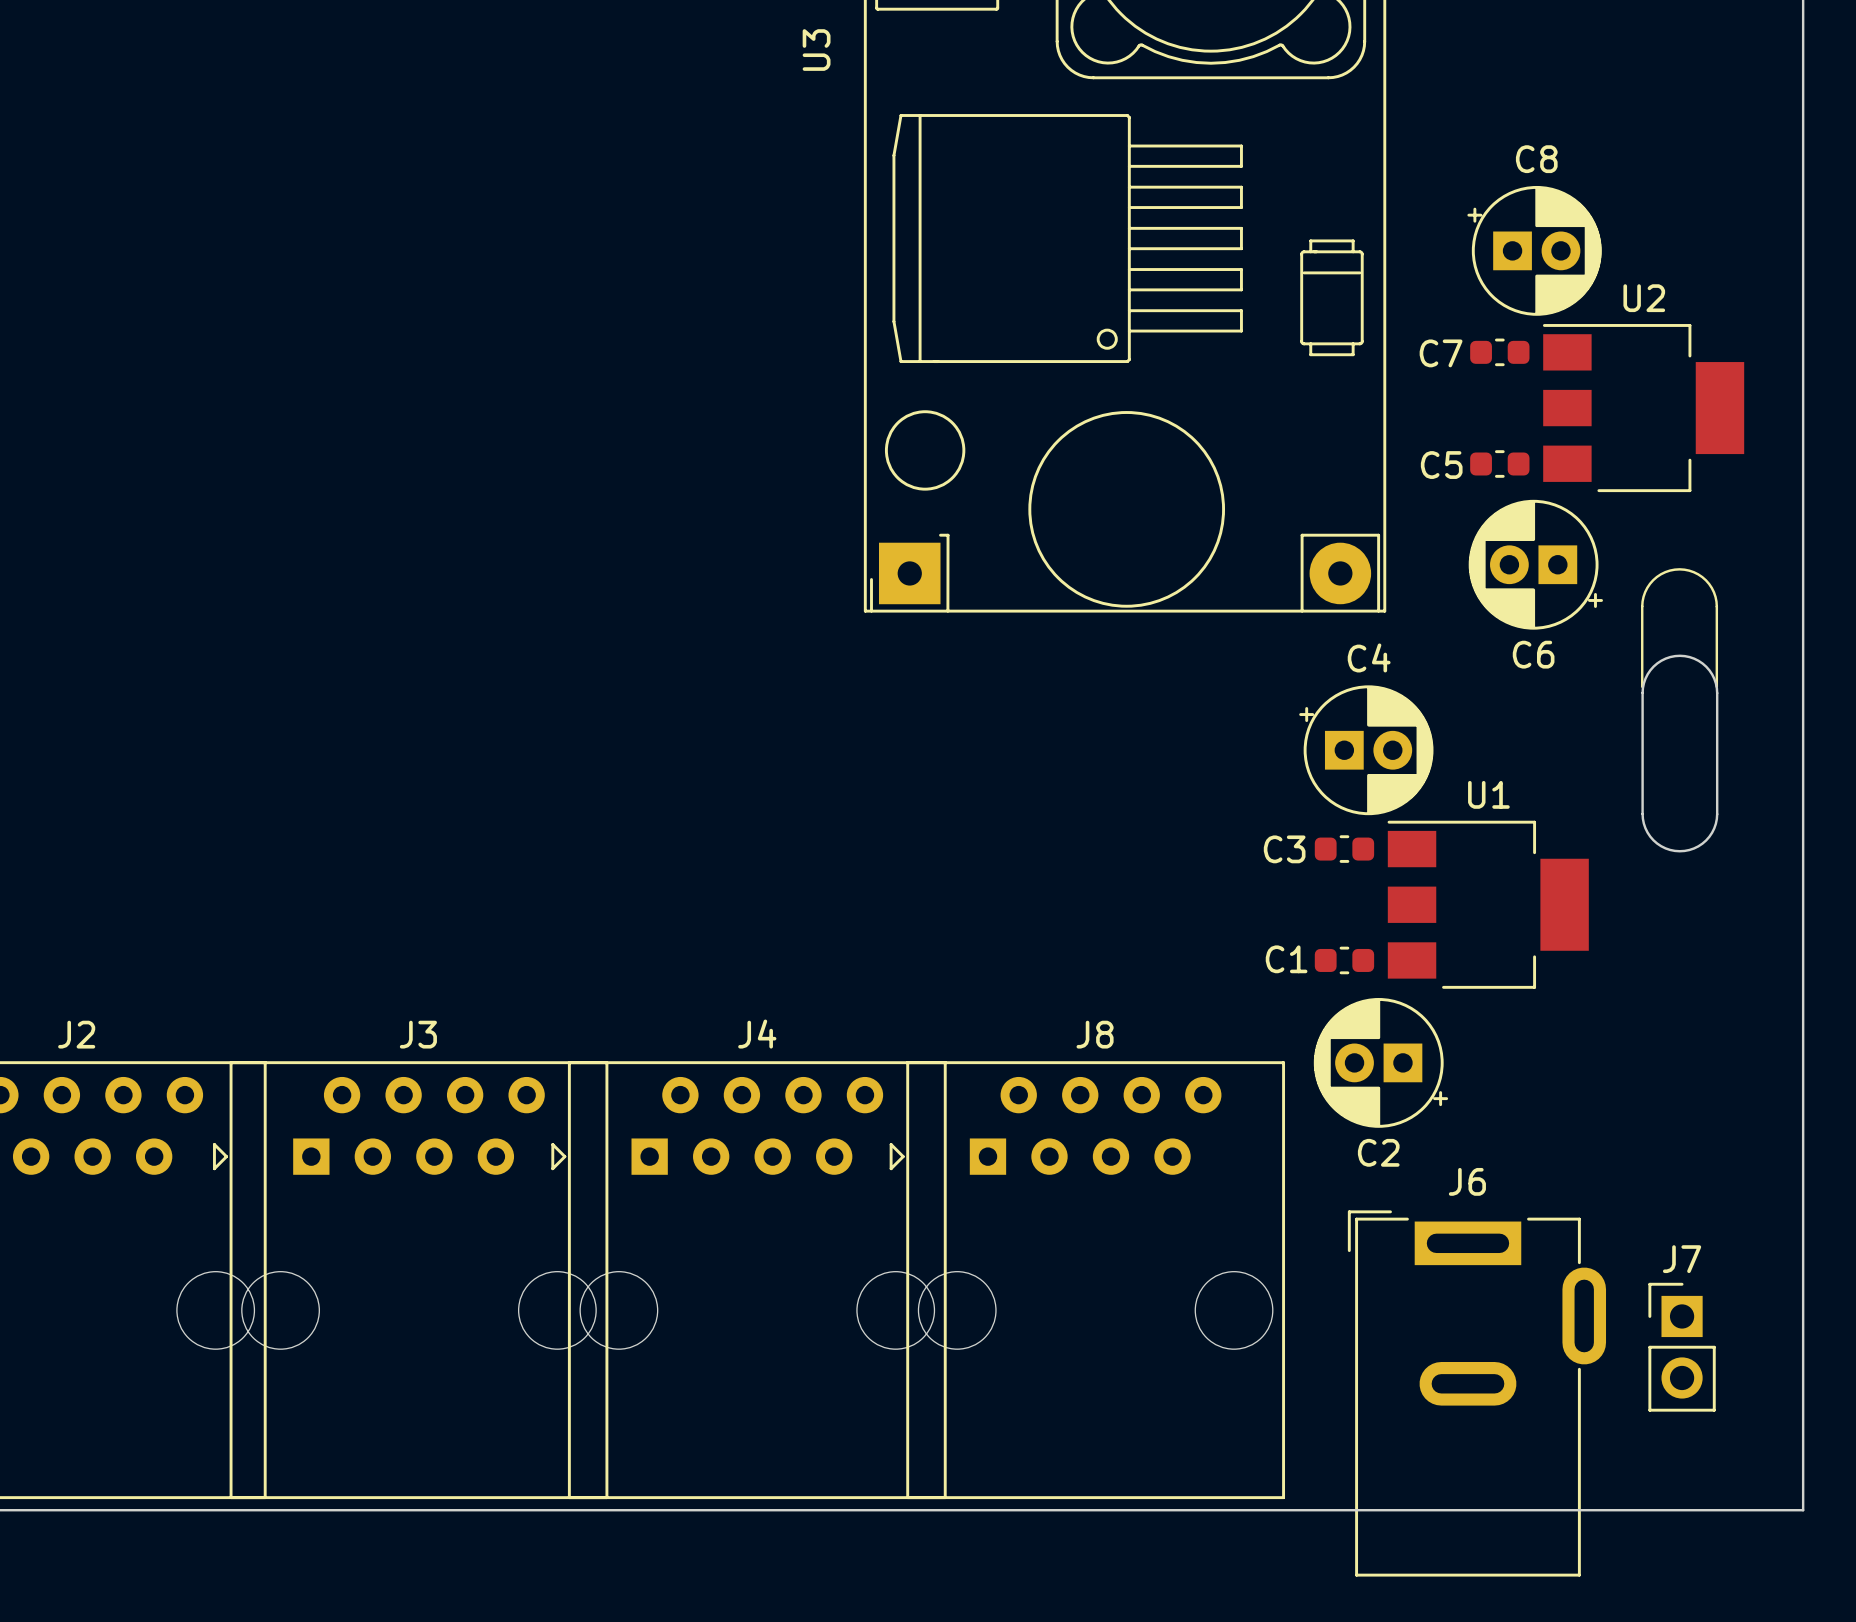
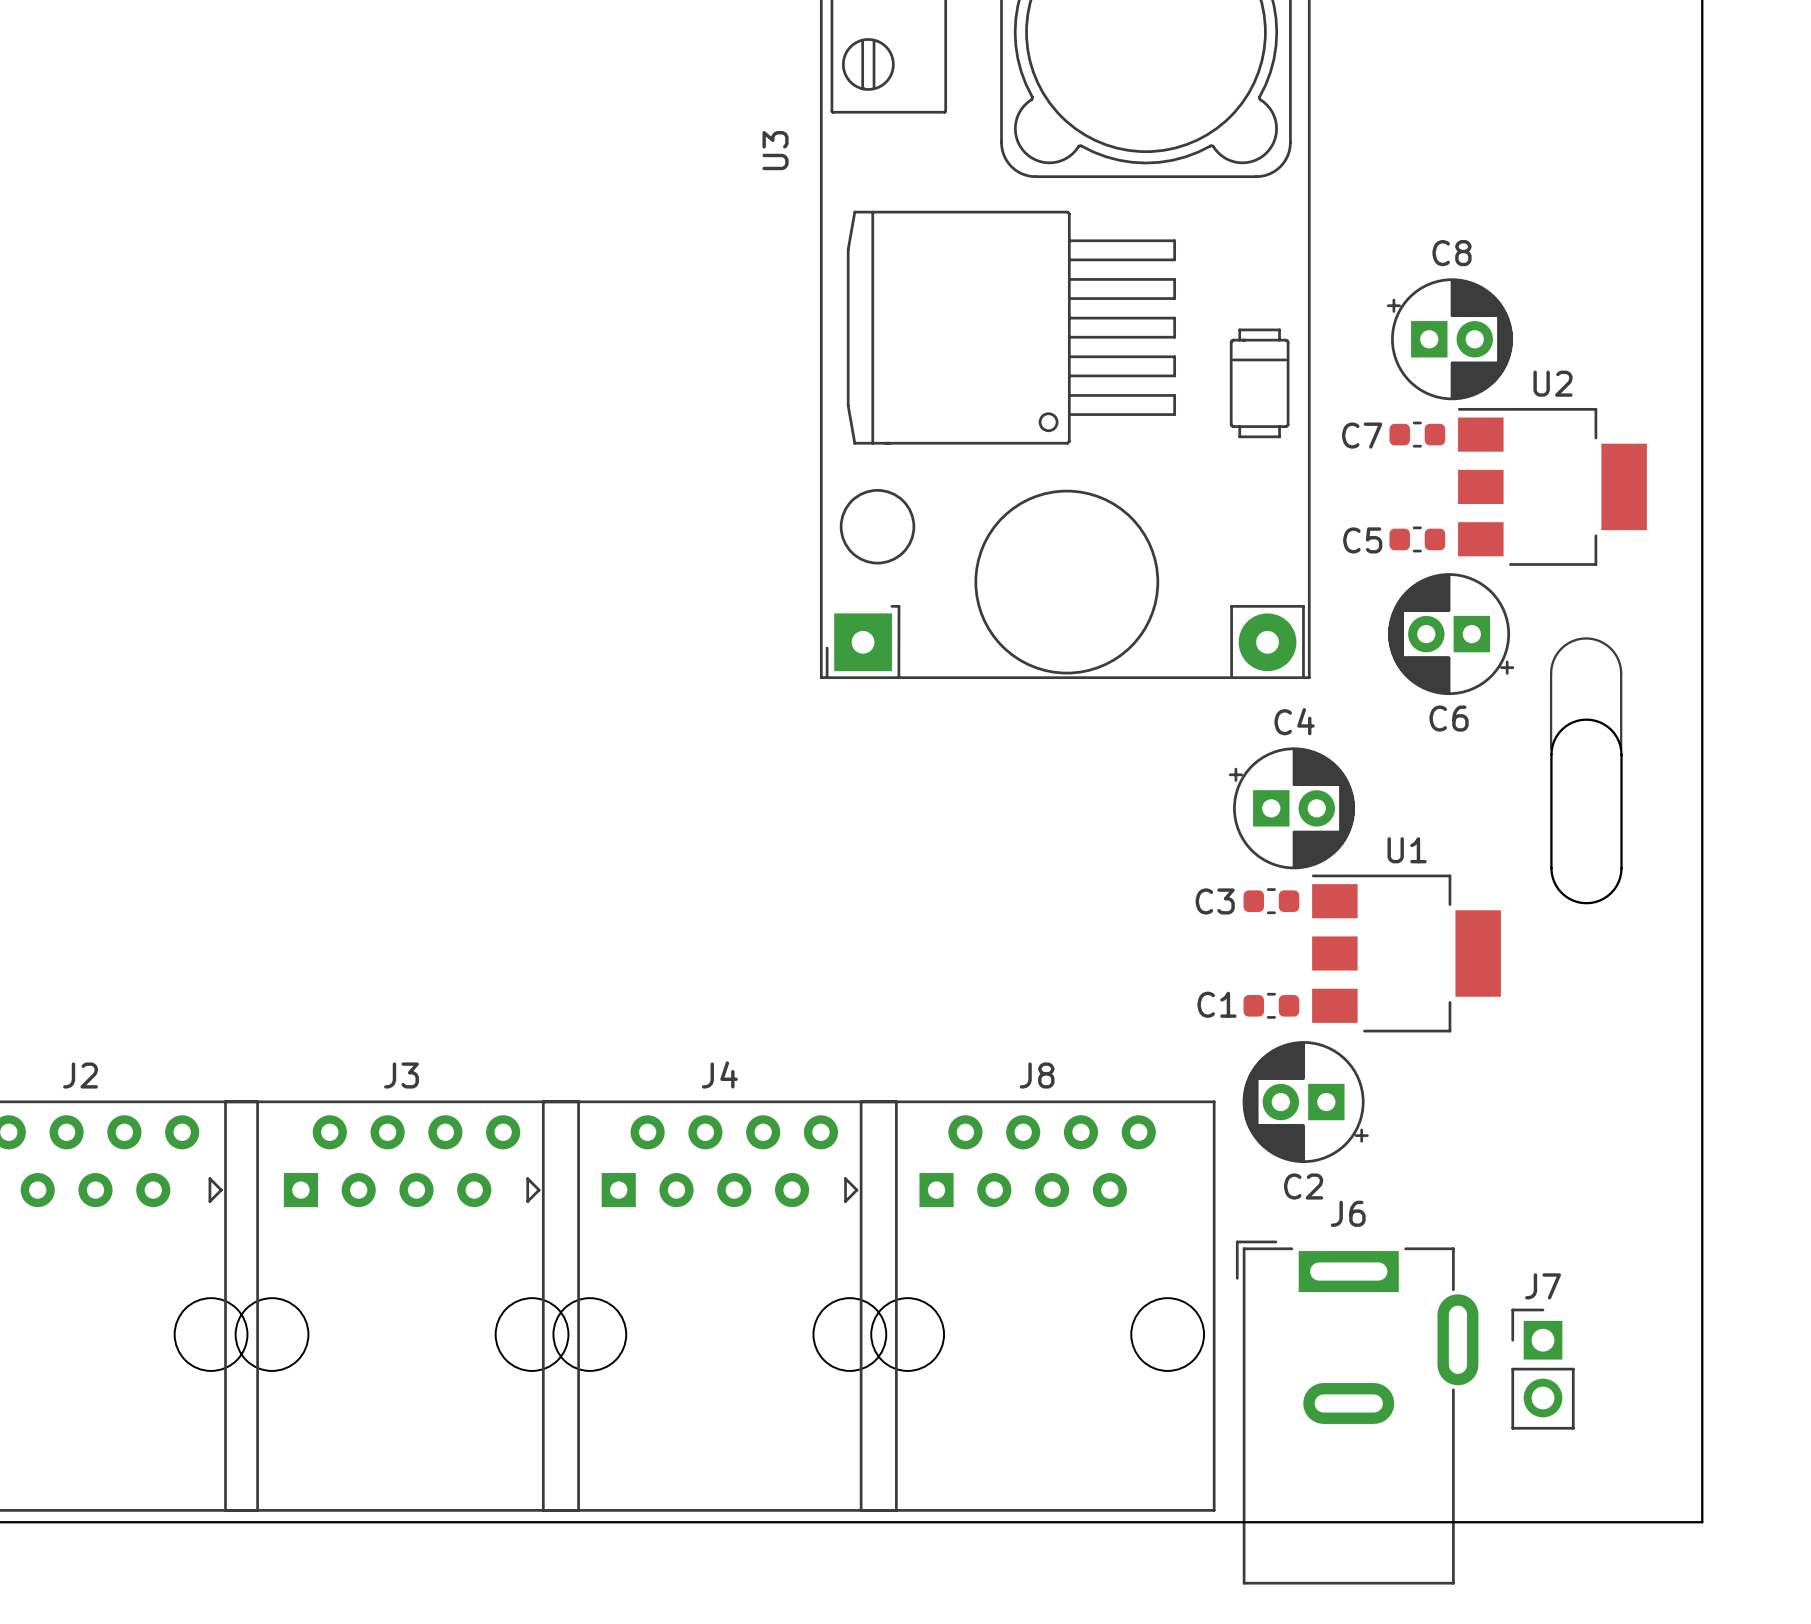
J7 position: (1682, 1347) -> (1543, 1369)
J6 position: (1476, 1393) -> (1357, 1412)

